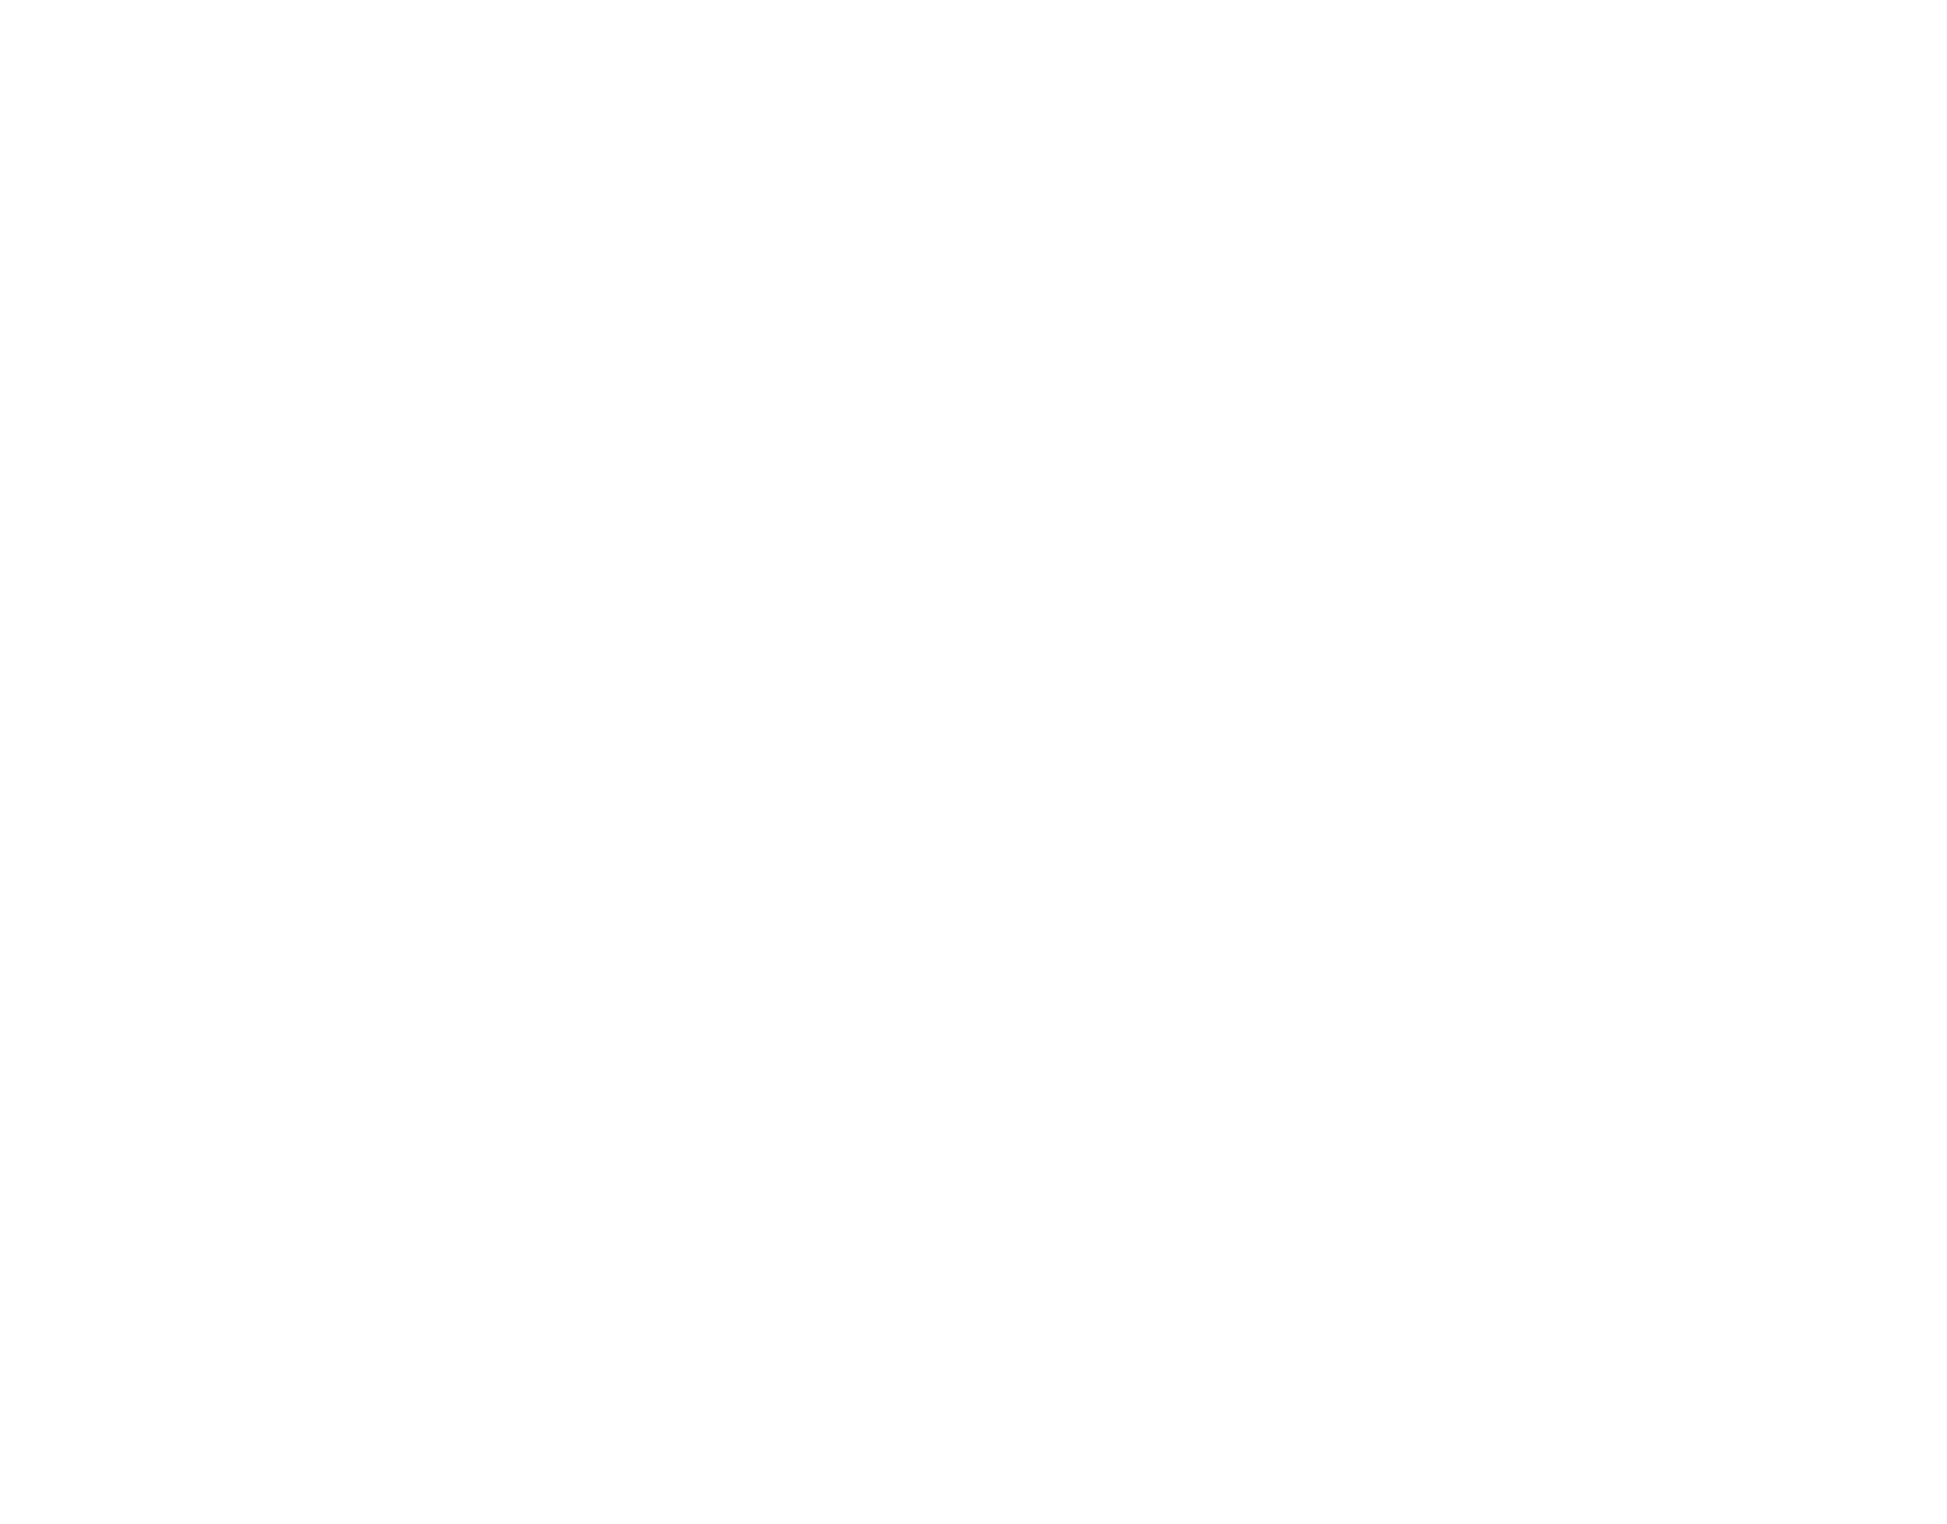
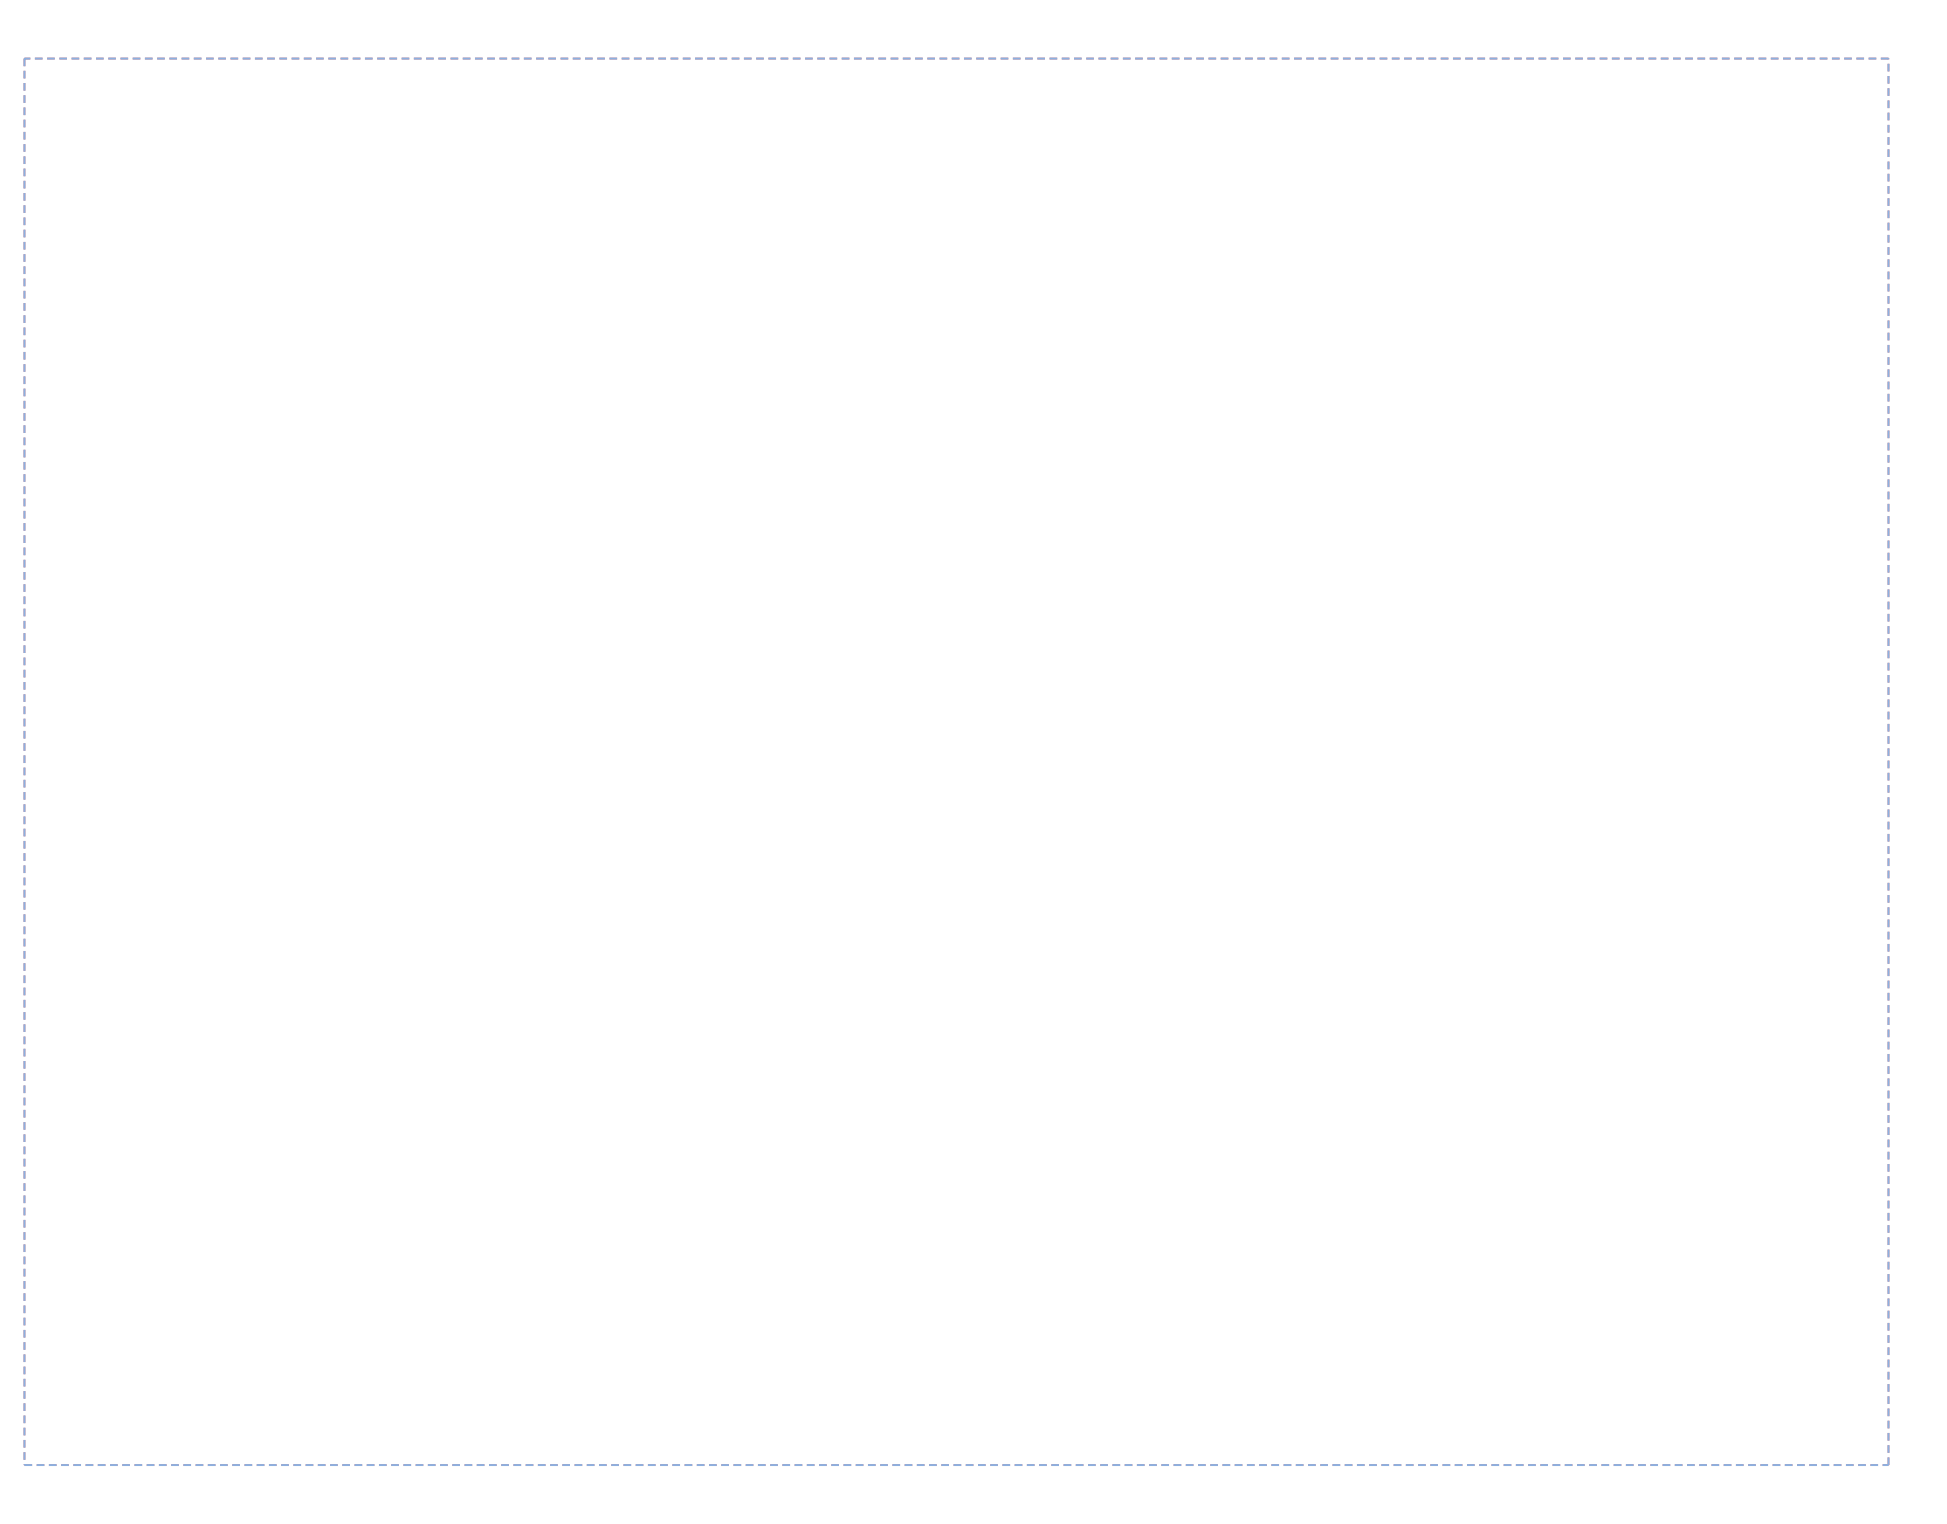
bottom zone outline: none -> (1888, 58) (24, 58) (24, 1465) (1888, 1465) (1888, 58)

